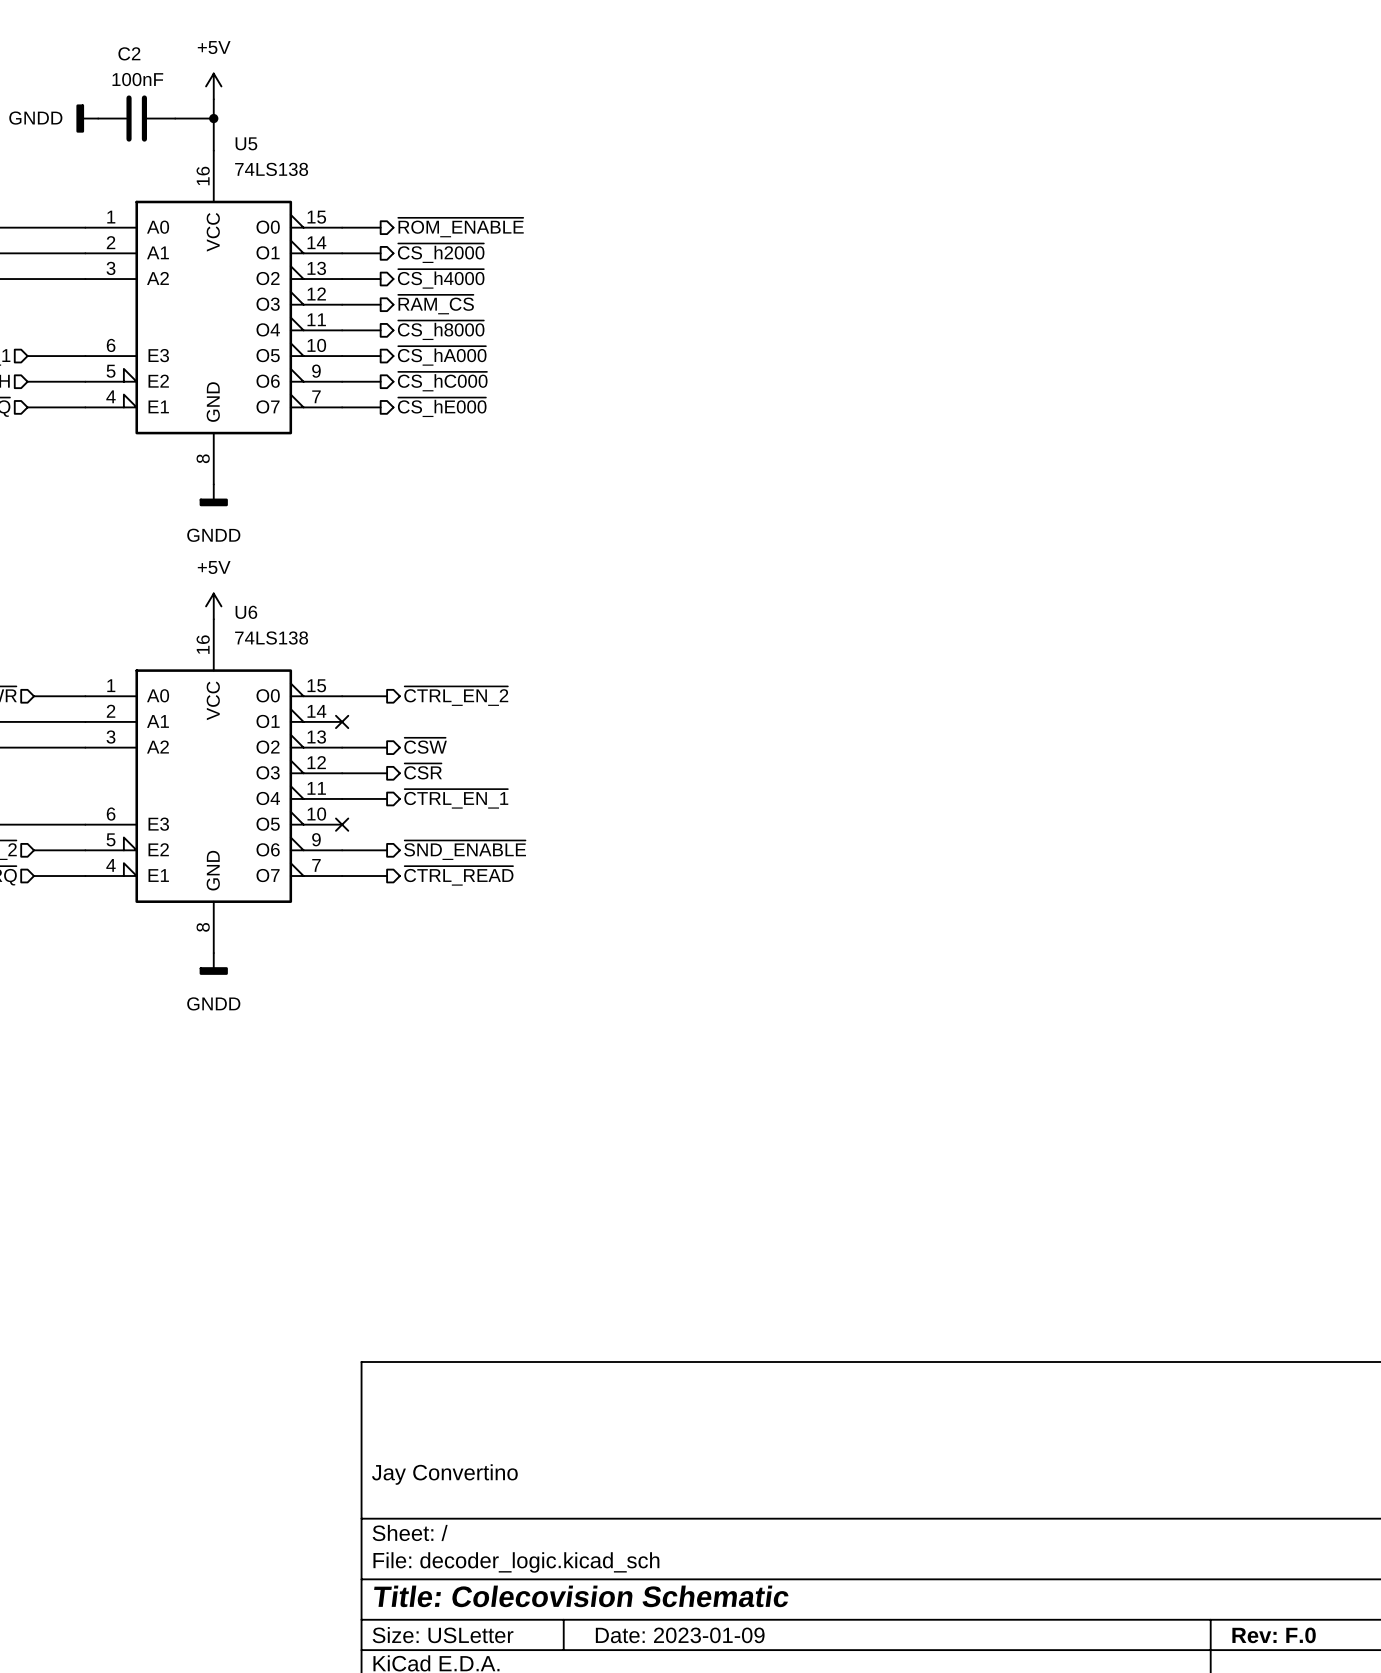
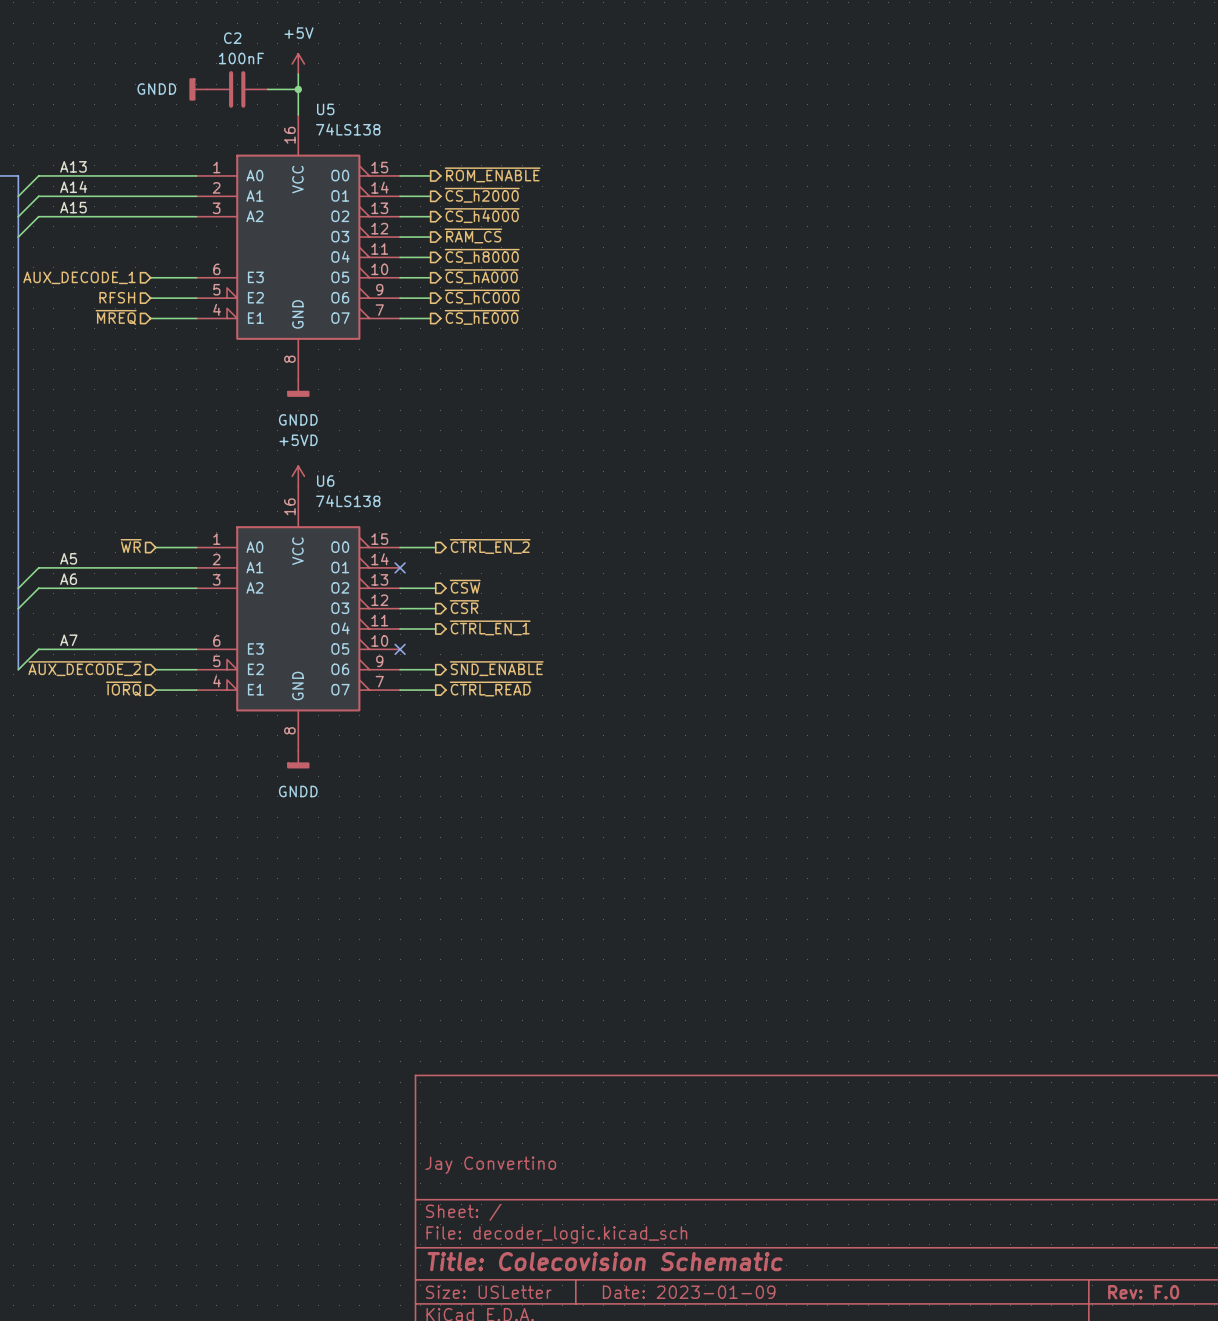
power symbol: +5V (213, 606) -> +5VD (298, 476)

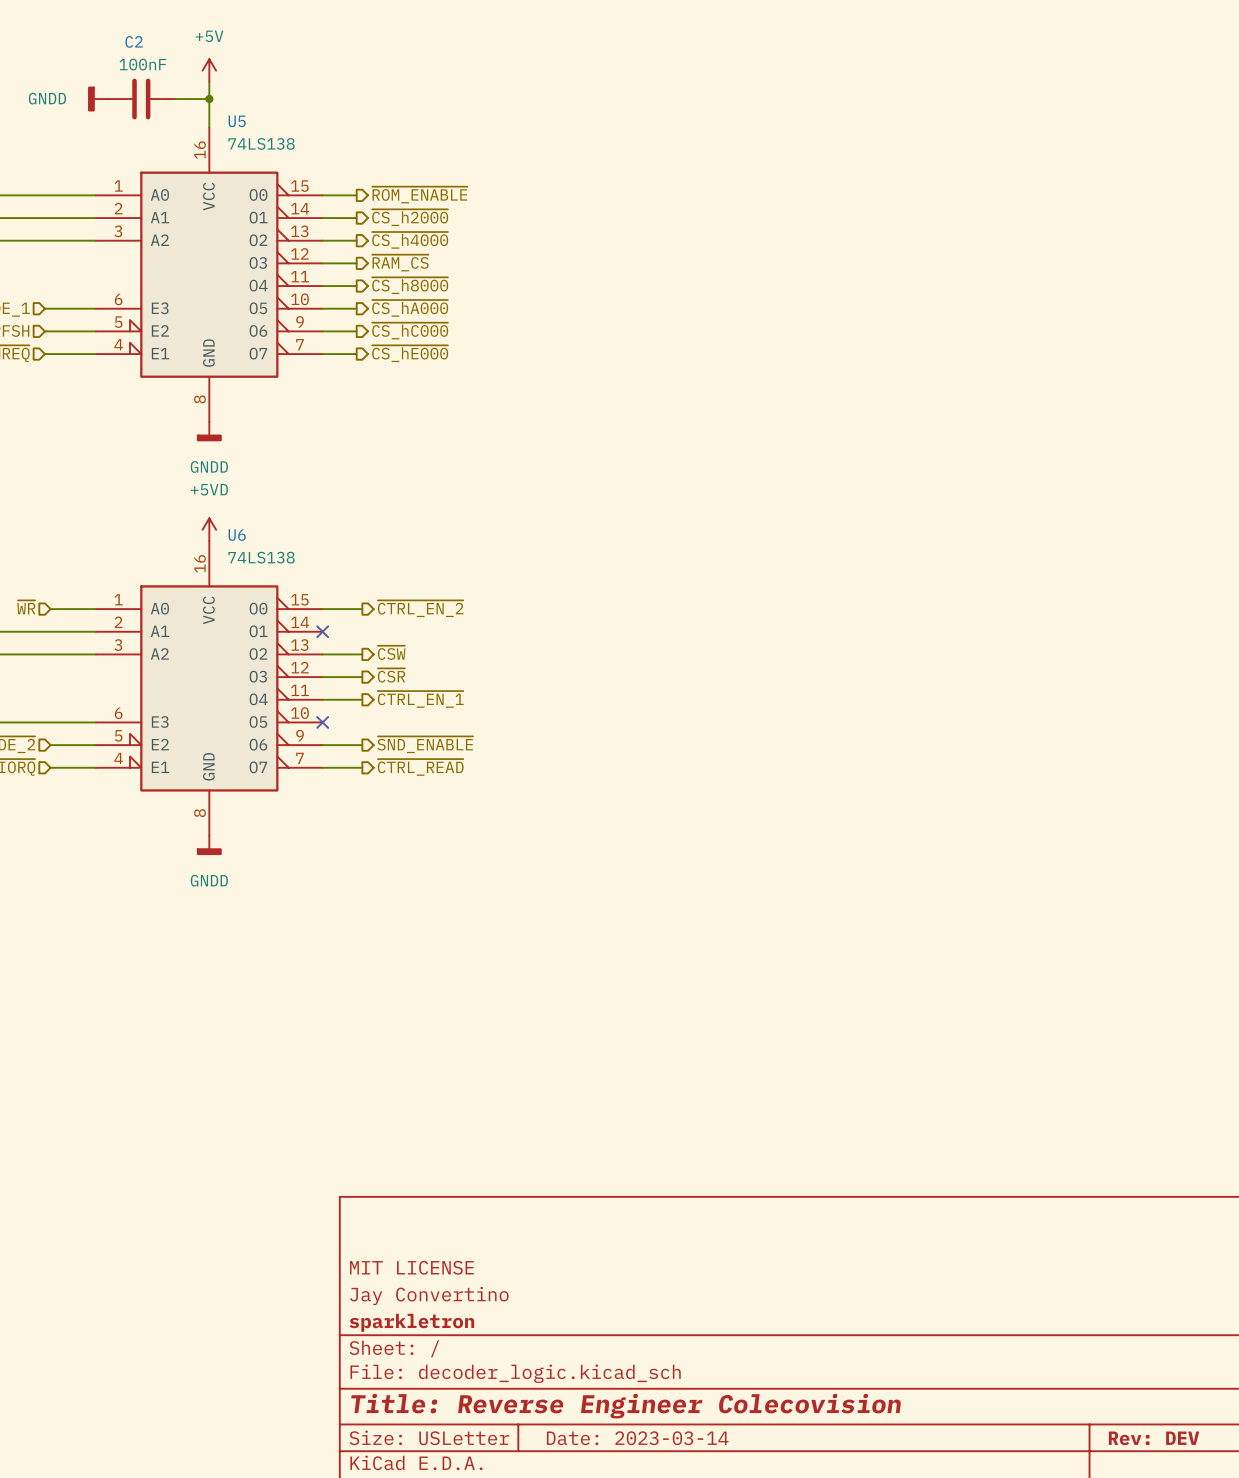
title block: none -> MIT LICENSE (411, 1267)
title block: none -> sparkletron (411, 1322)
title block: Title: Colecovision Schematic (605, 1261) -> Title: Reverse Engineer Colecovision (626, 1406)
title block: Date: 2023-01-09 (689, 1292) -> Date: 2023-03-14 (637, 1438)
title block: Rev: F.0 (1143, 1292) -> Rev: DEV (1154, 1438)

